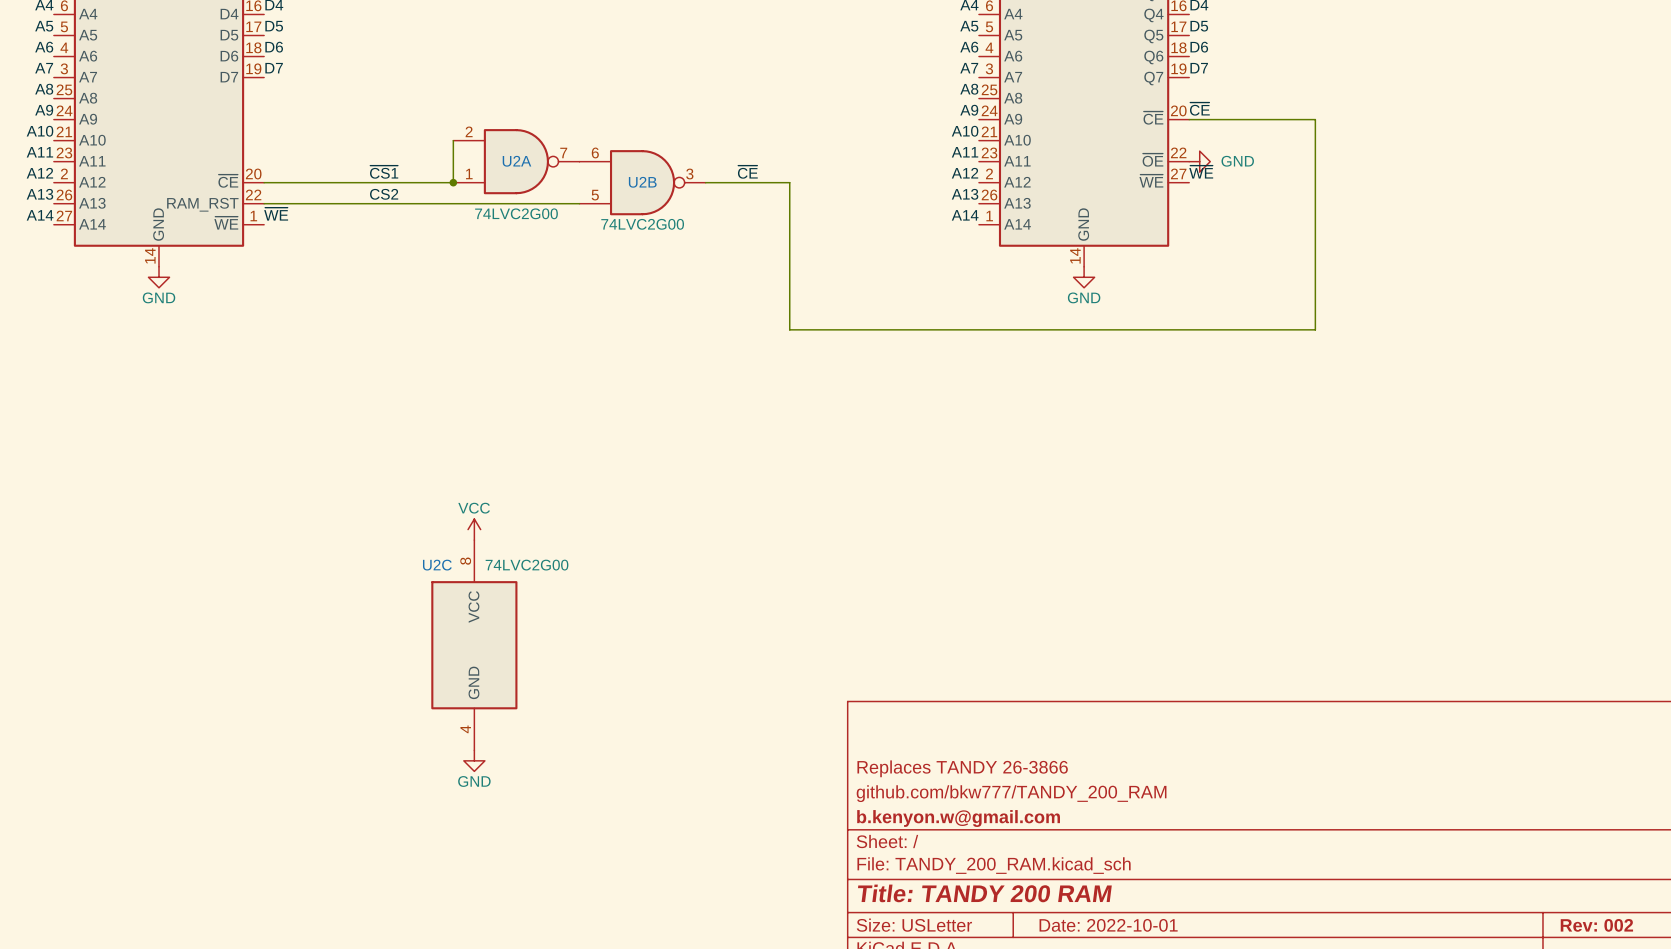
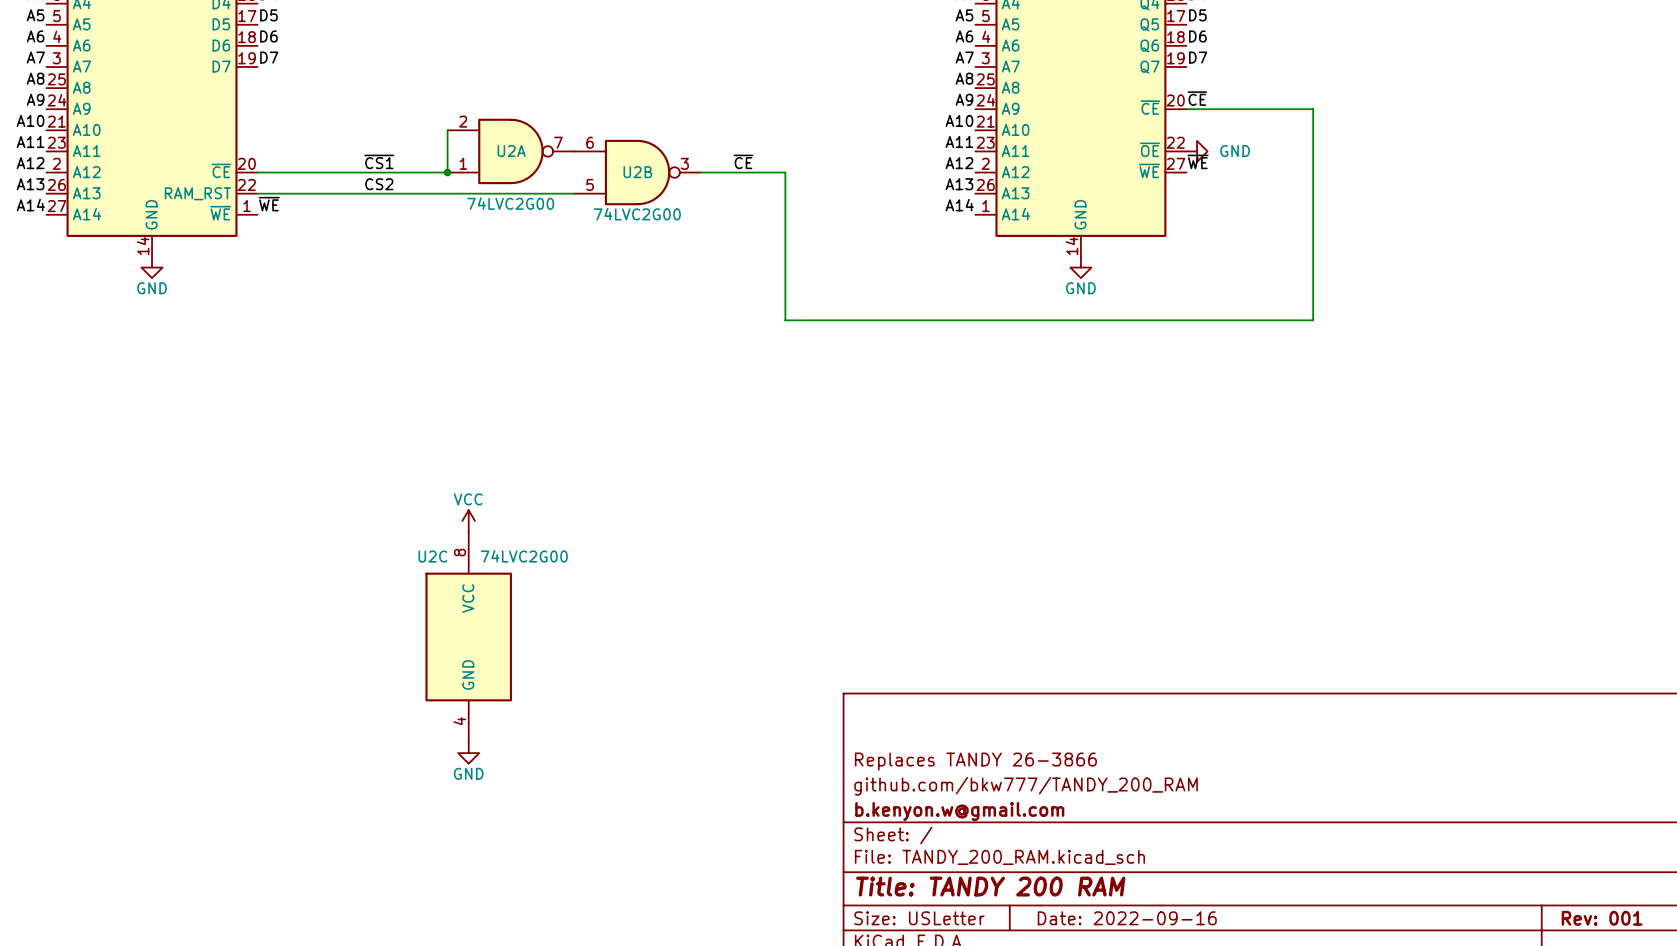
title block: Date: 2022-10-01 (1108, 925) -> Date: 2022-09-16 (1127, 918)
title block: Rev: 002 (1596, 925) -> Rev: 001 (1602, 918)

